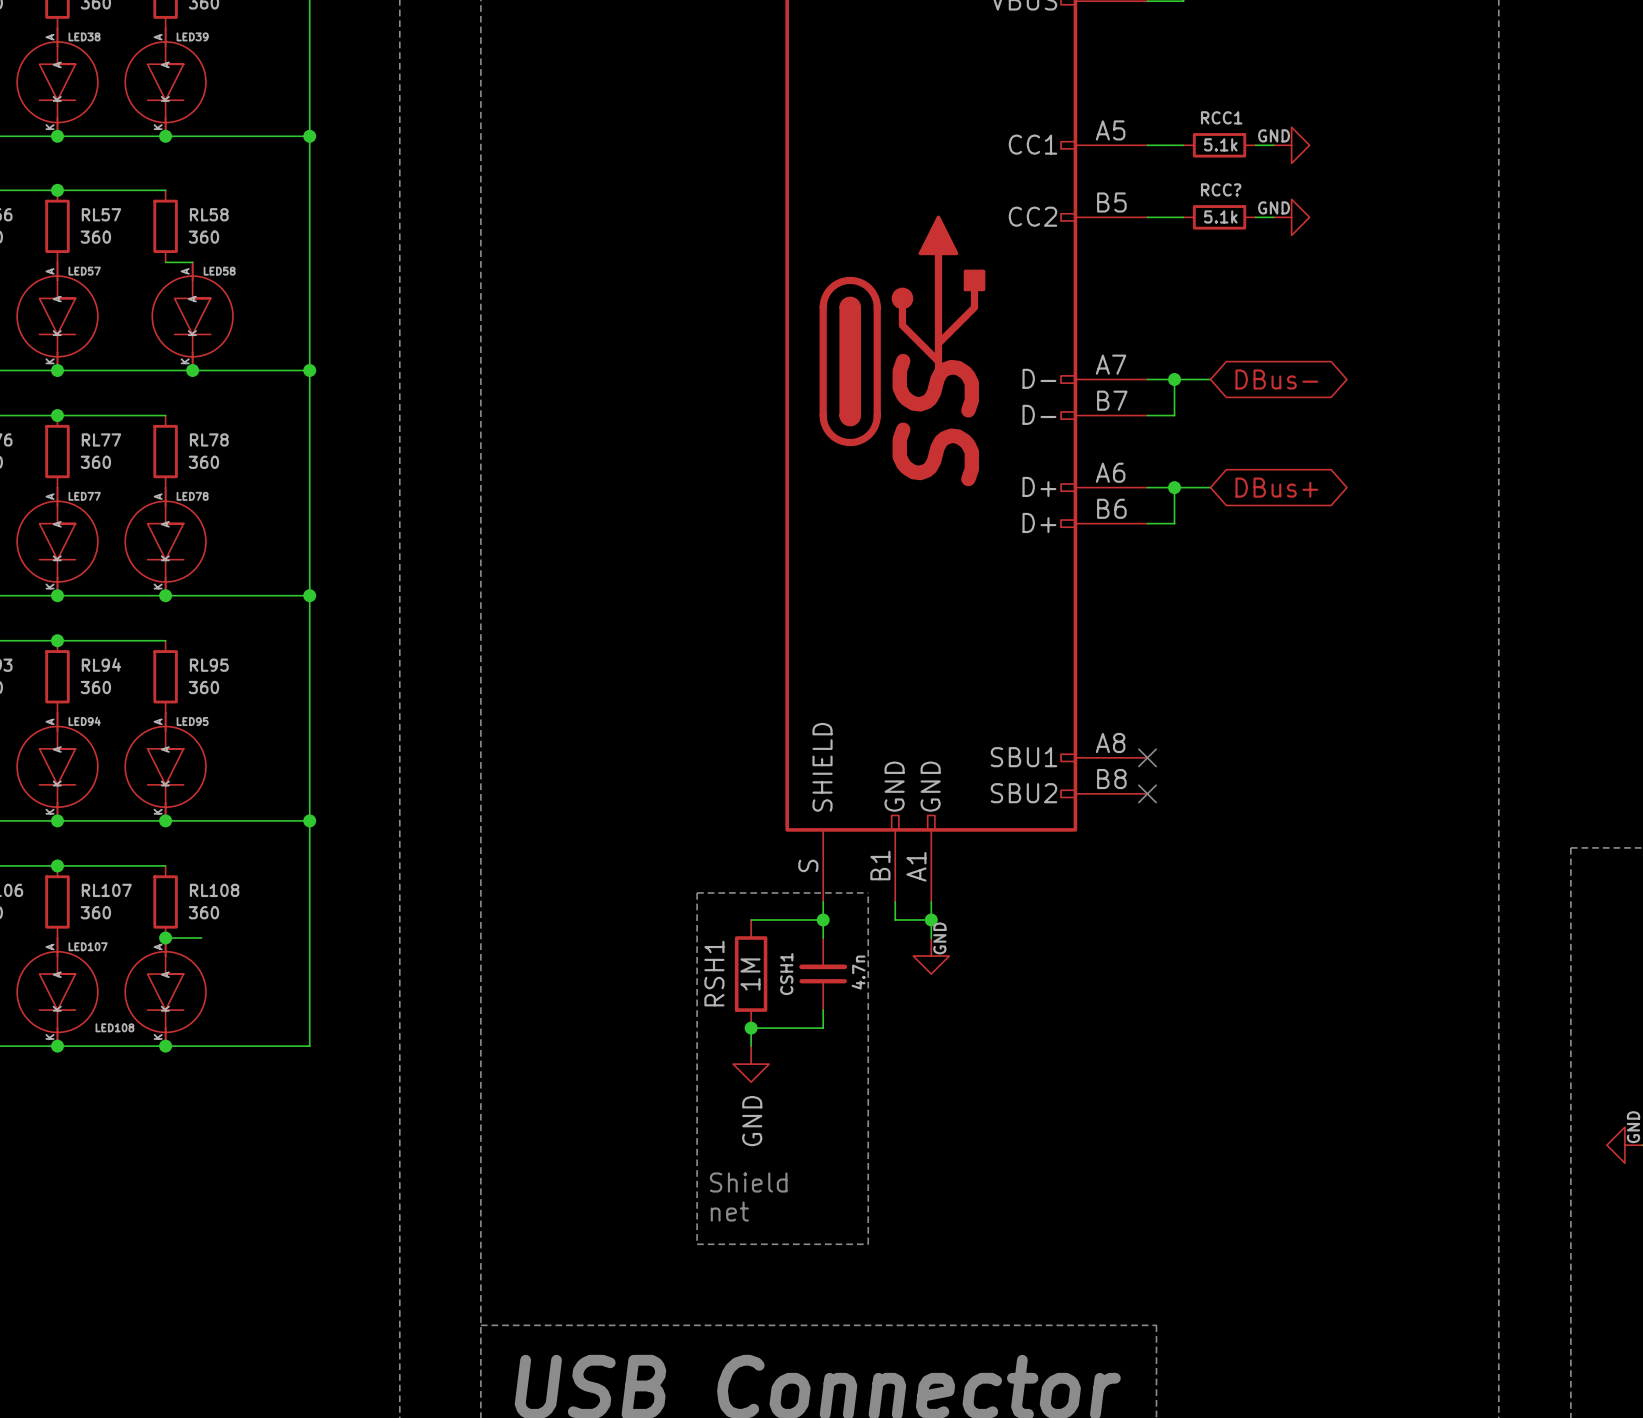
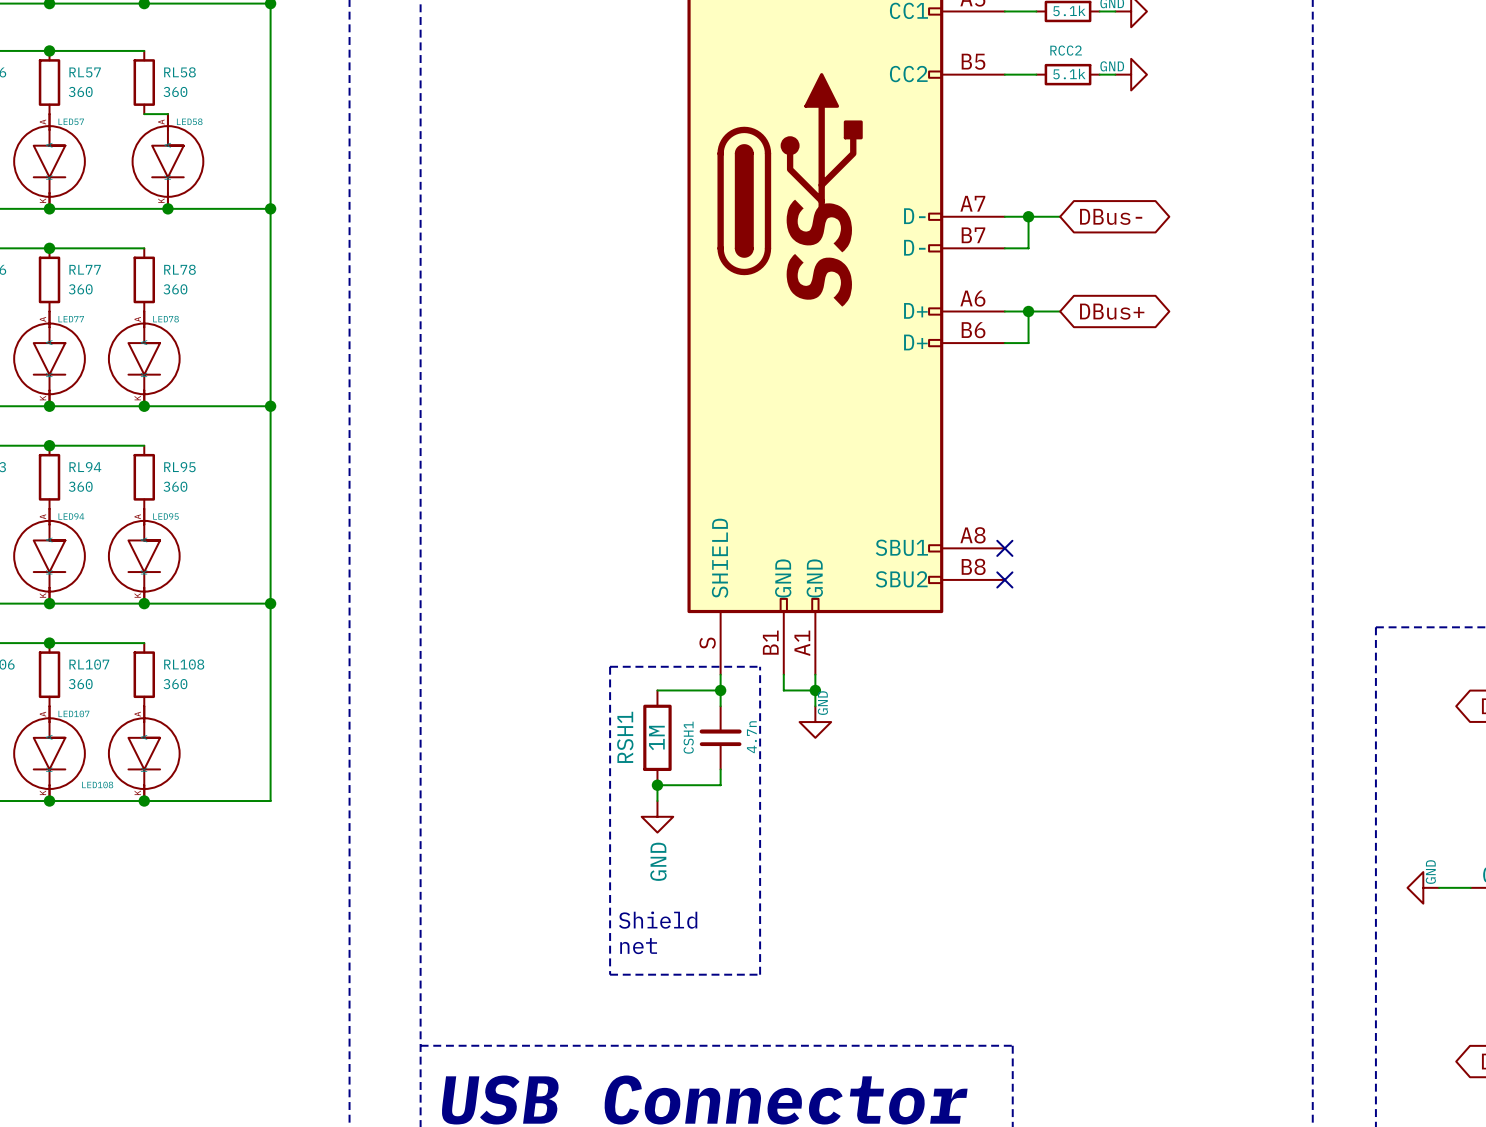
RCC? name: RCC? (1221, 189) -> RCC2 (1066, 50)
wire: (165, 938) (201, 938) -> none
junction: (165, 938) -> none

